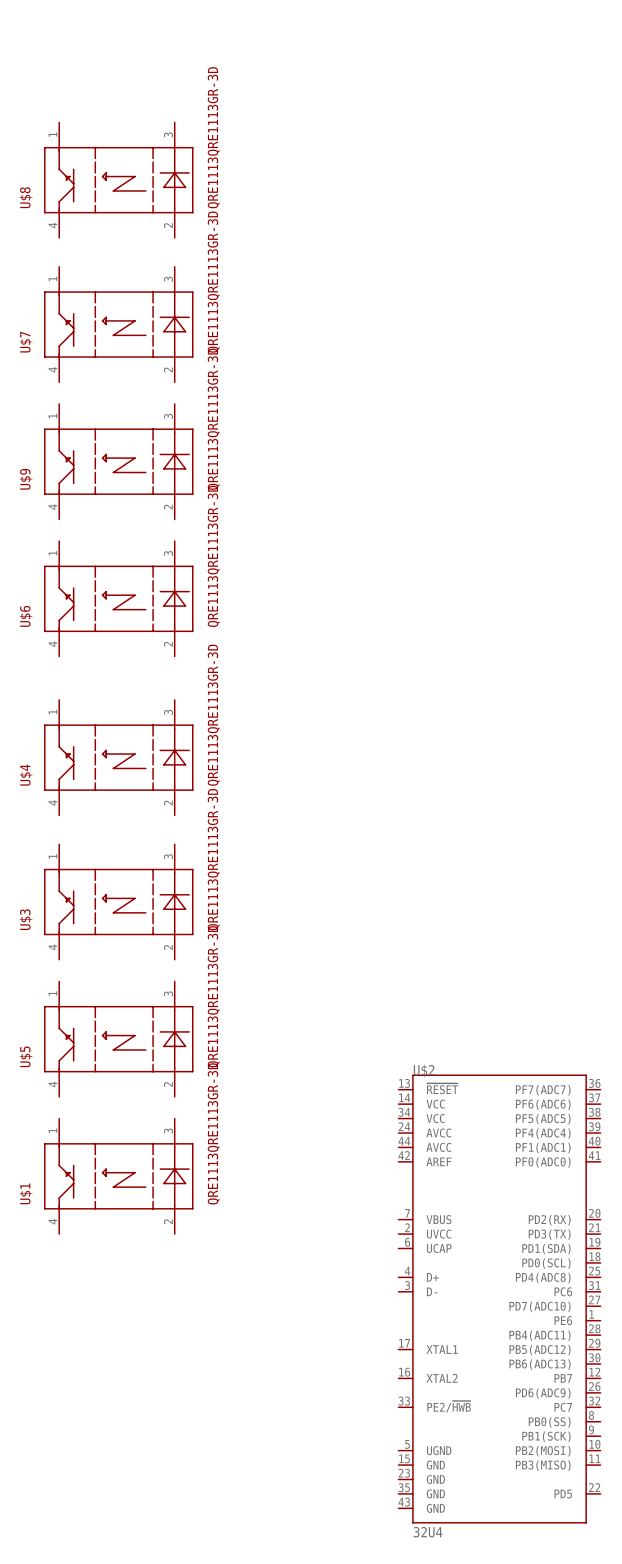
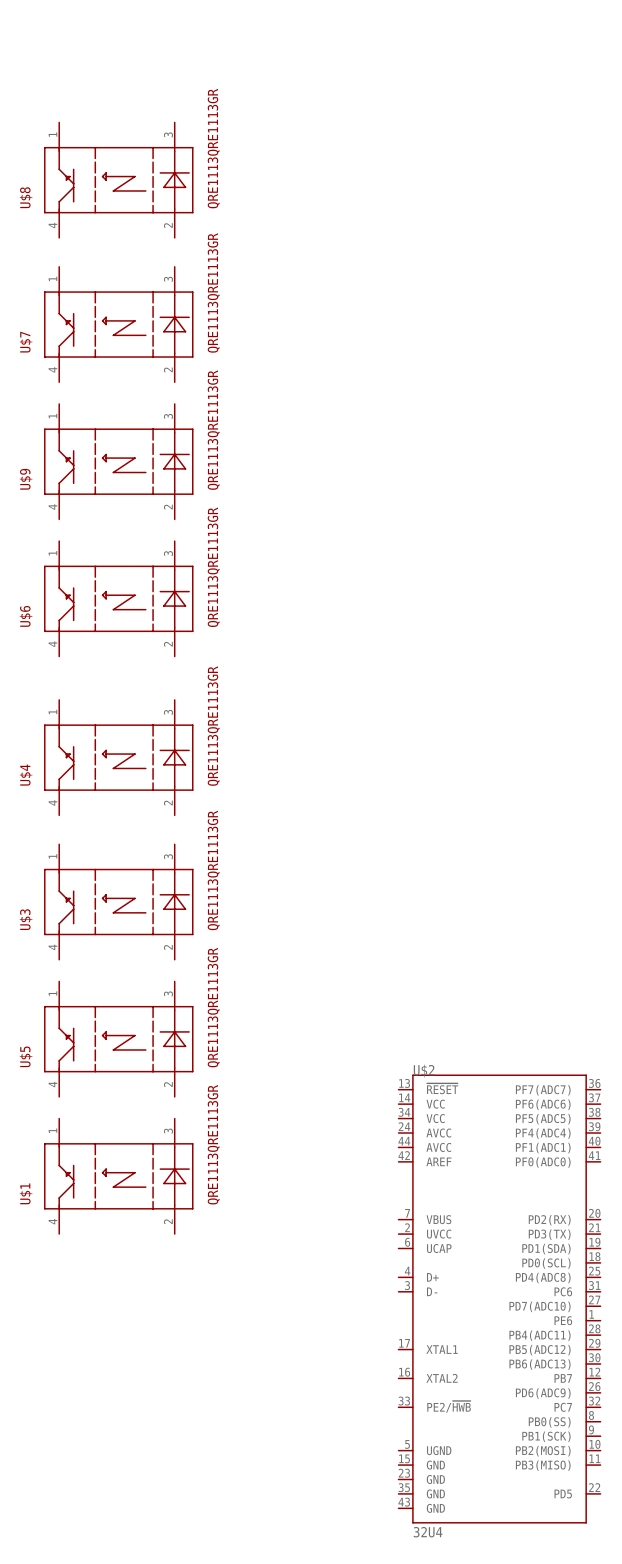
U$8 value: QRE1113QRE1113GR-3D (213, 137) -> QRE1113QRE1113GR (213, 148)
U$7 value: QRE1113QRE1113GR-3D (213, 282) -> QRE1113QRE1113GR (213, 292)
U$9 value: QRE1113QRE1113GR-3D (213, 419) -> QRE1113QRE1113GR (213, 430)
U$6 value: QRE1113QRE1113GR-3D (213, 556) -> QRE1113QRE1113GR (213, 567)
U$4 value: QRE1113QRE1113GR-3D (213, 715) -> QRE1113QRE1113GR (213, 726)
U$3 value: QRE1113QRE1113GR-3D (213, 859) -> QRE1113QRE1113GR (213, 870)
U$5 value: QRE1113QRE1113GR-3D (213, 996) -> QRE1113QRE1113GR (213, 1007)
U$1 value: QRE1113QRE1113GR-3D (213, 1133) -> QRE1113QRE1113GR (213, 1144)

